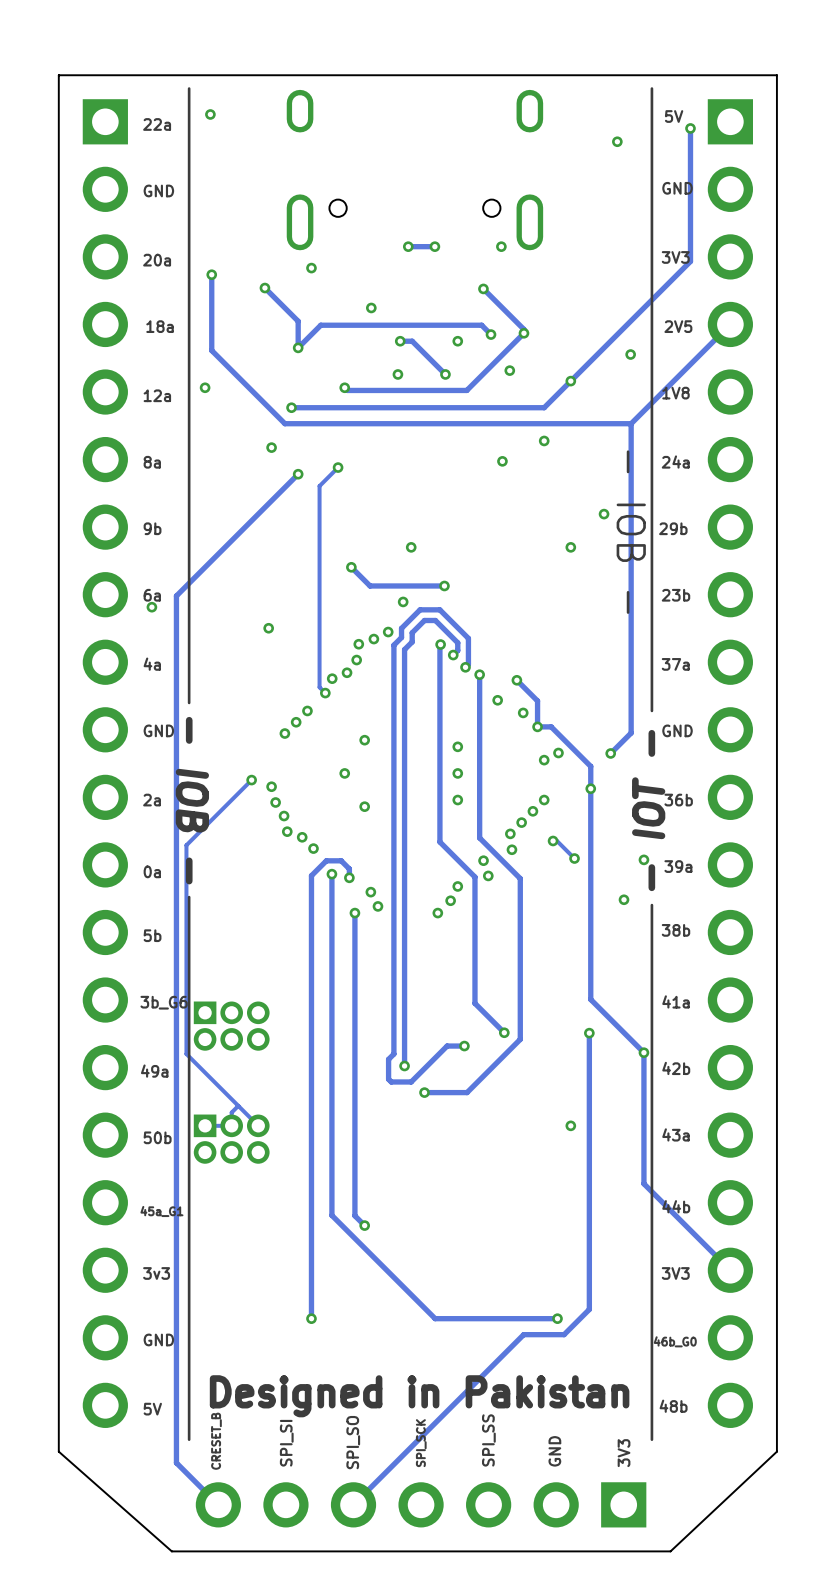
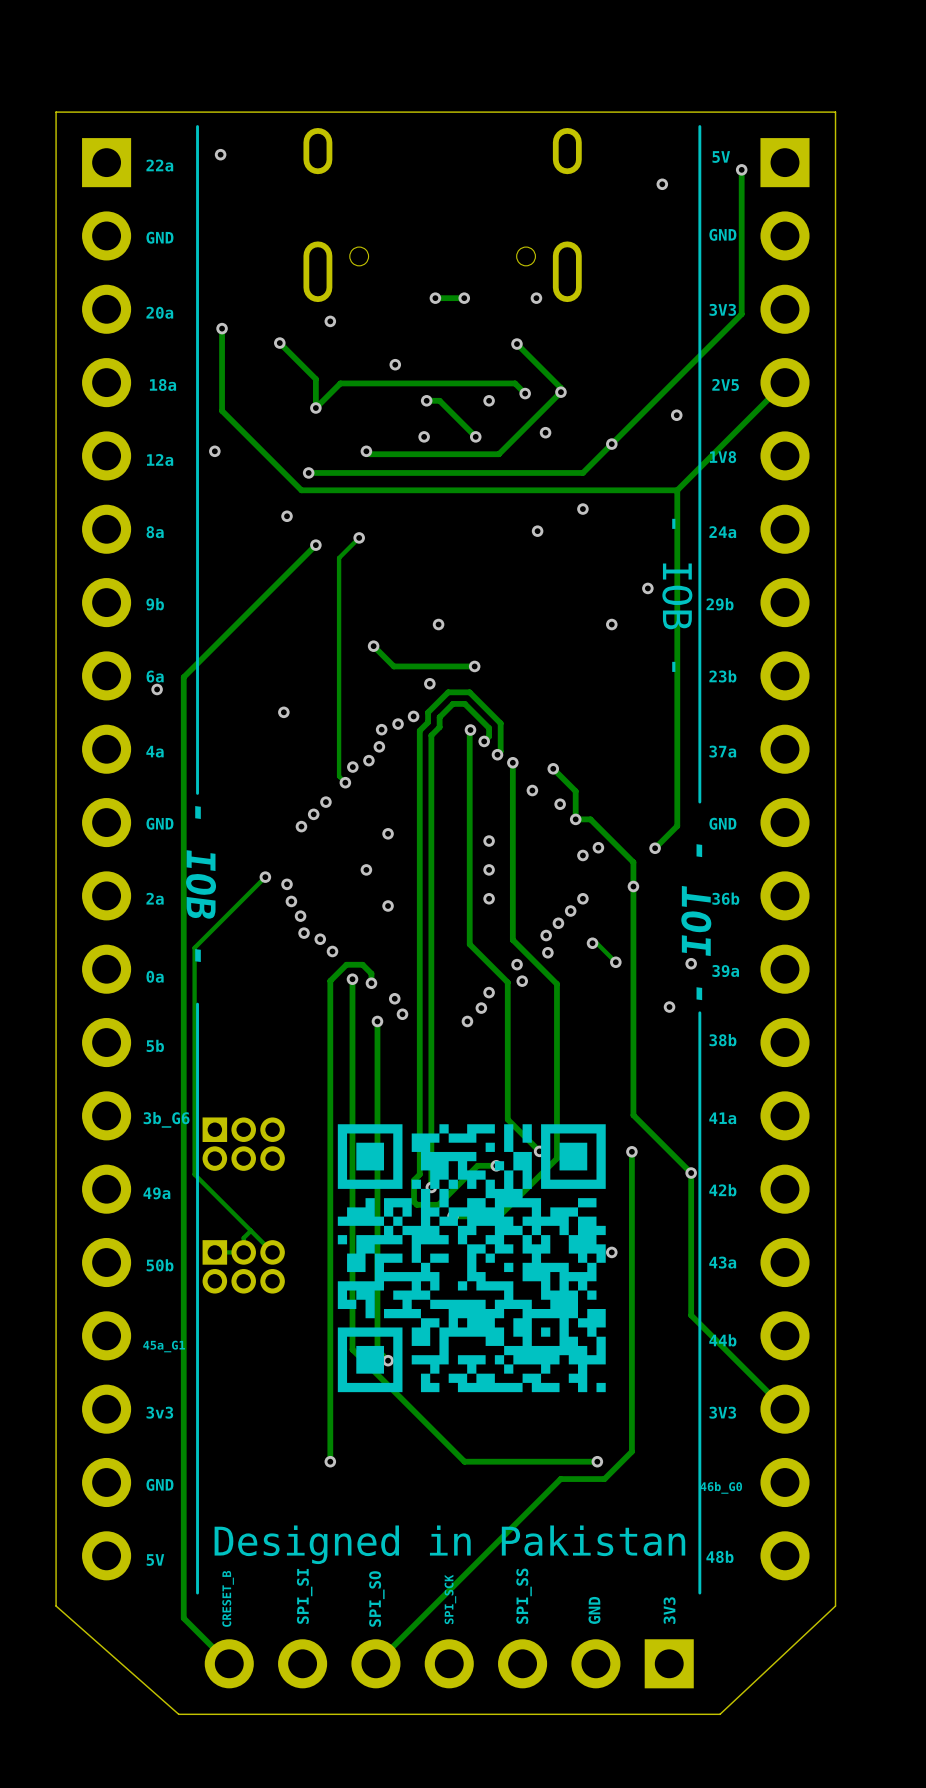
drawing: none -> [337, 1124, 606, 1393]

